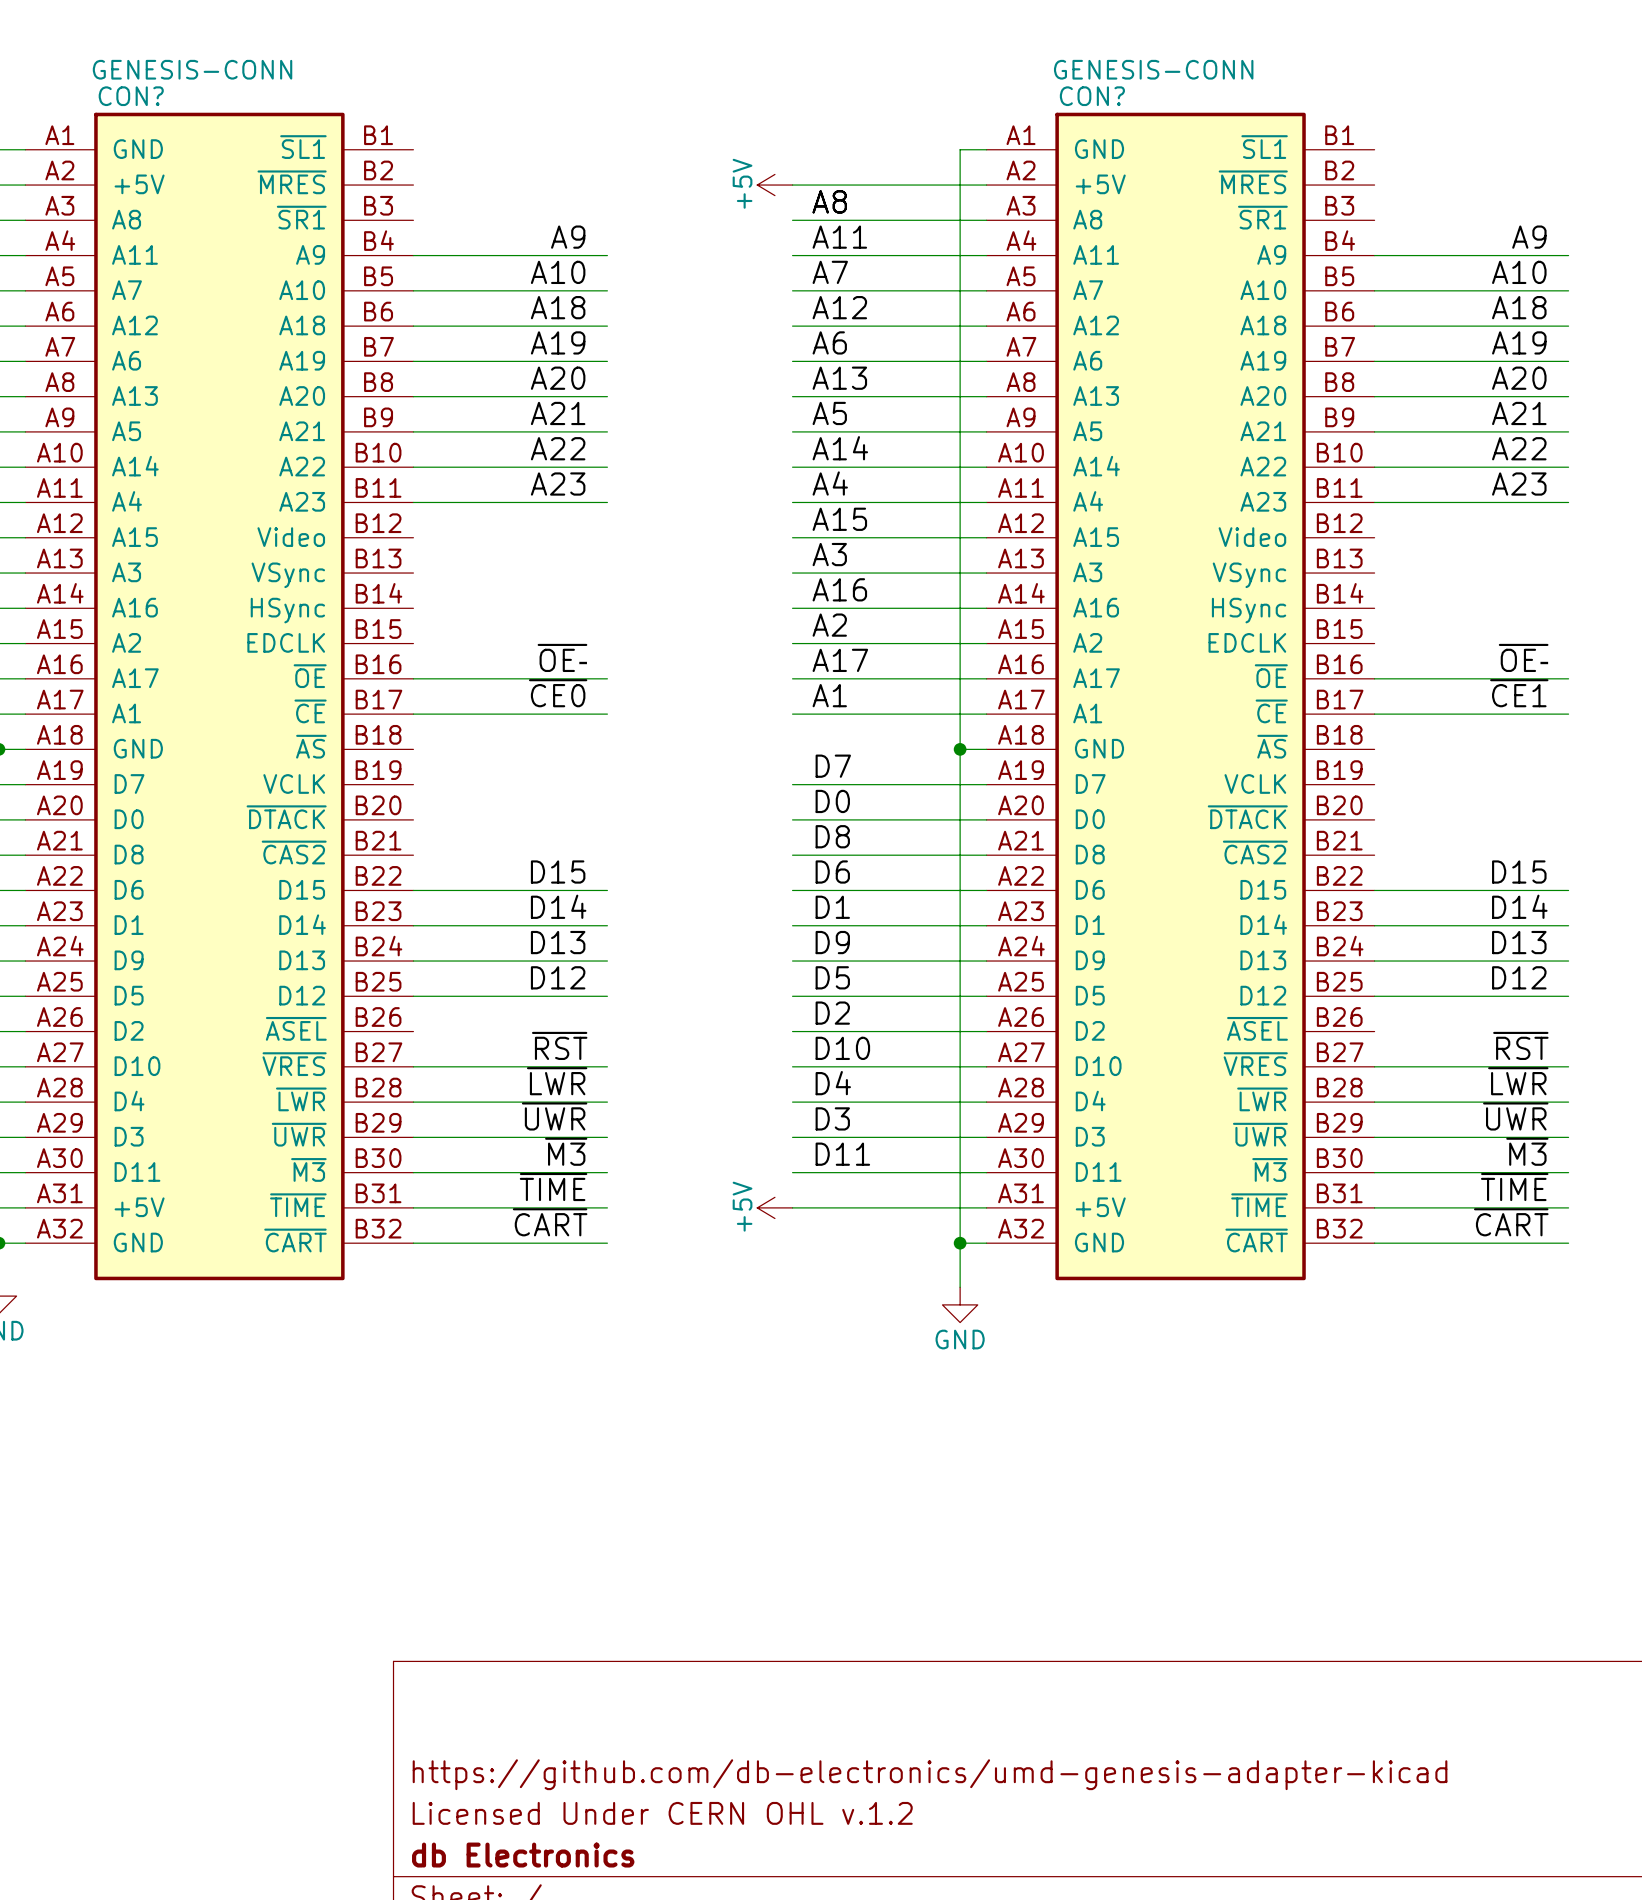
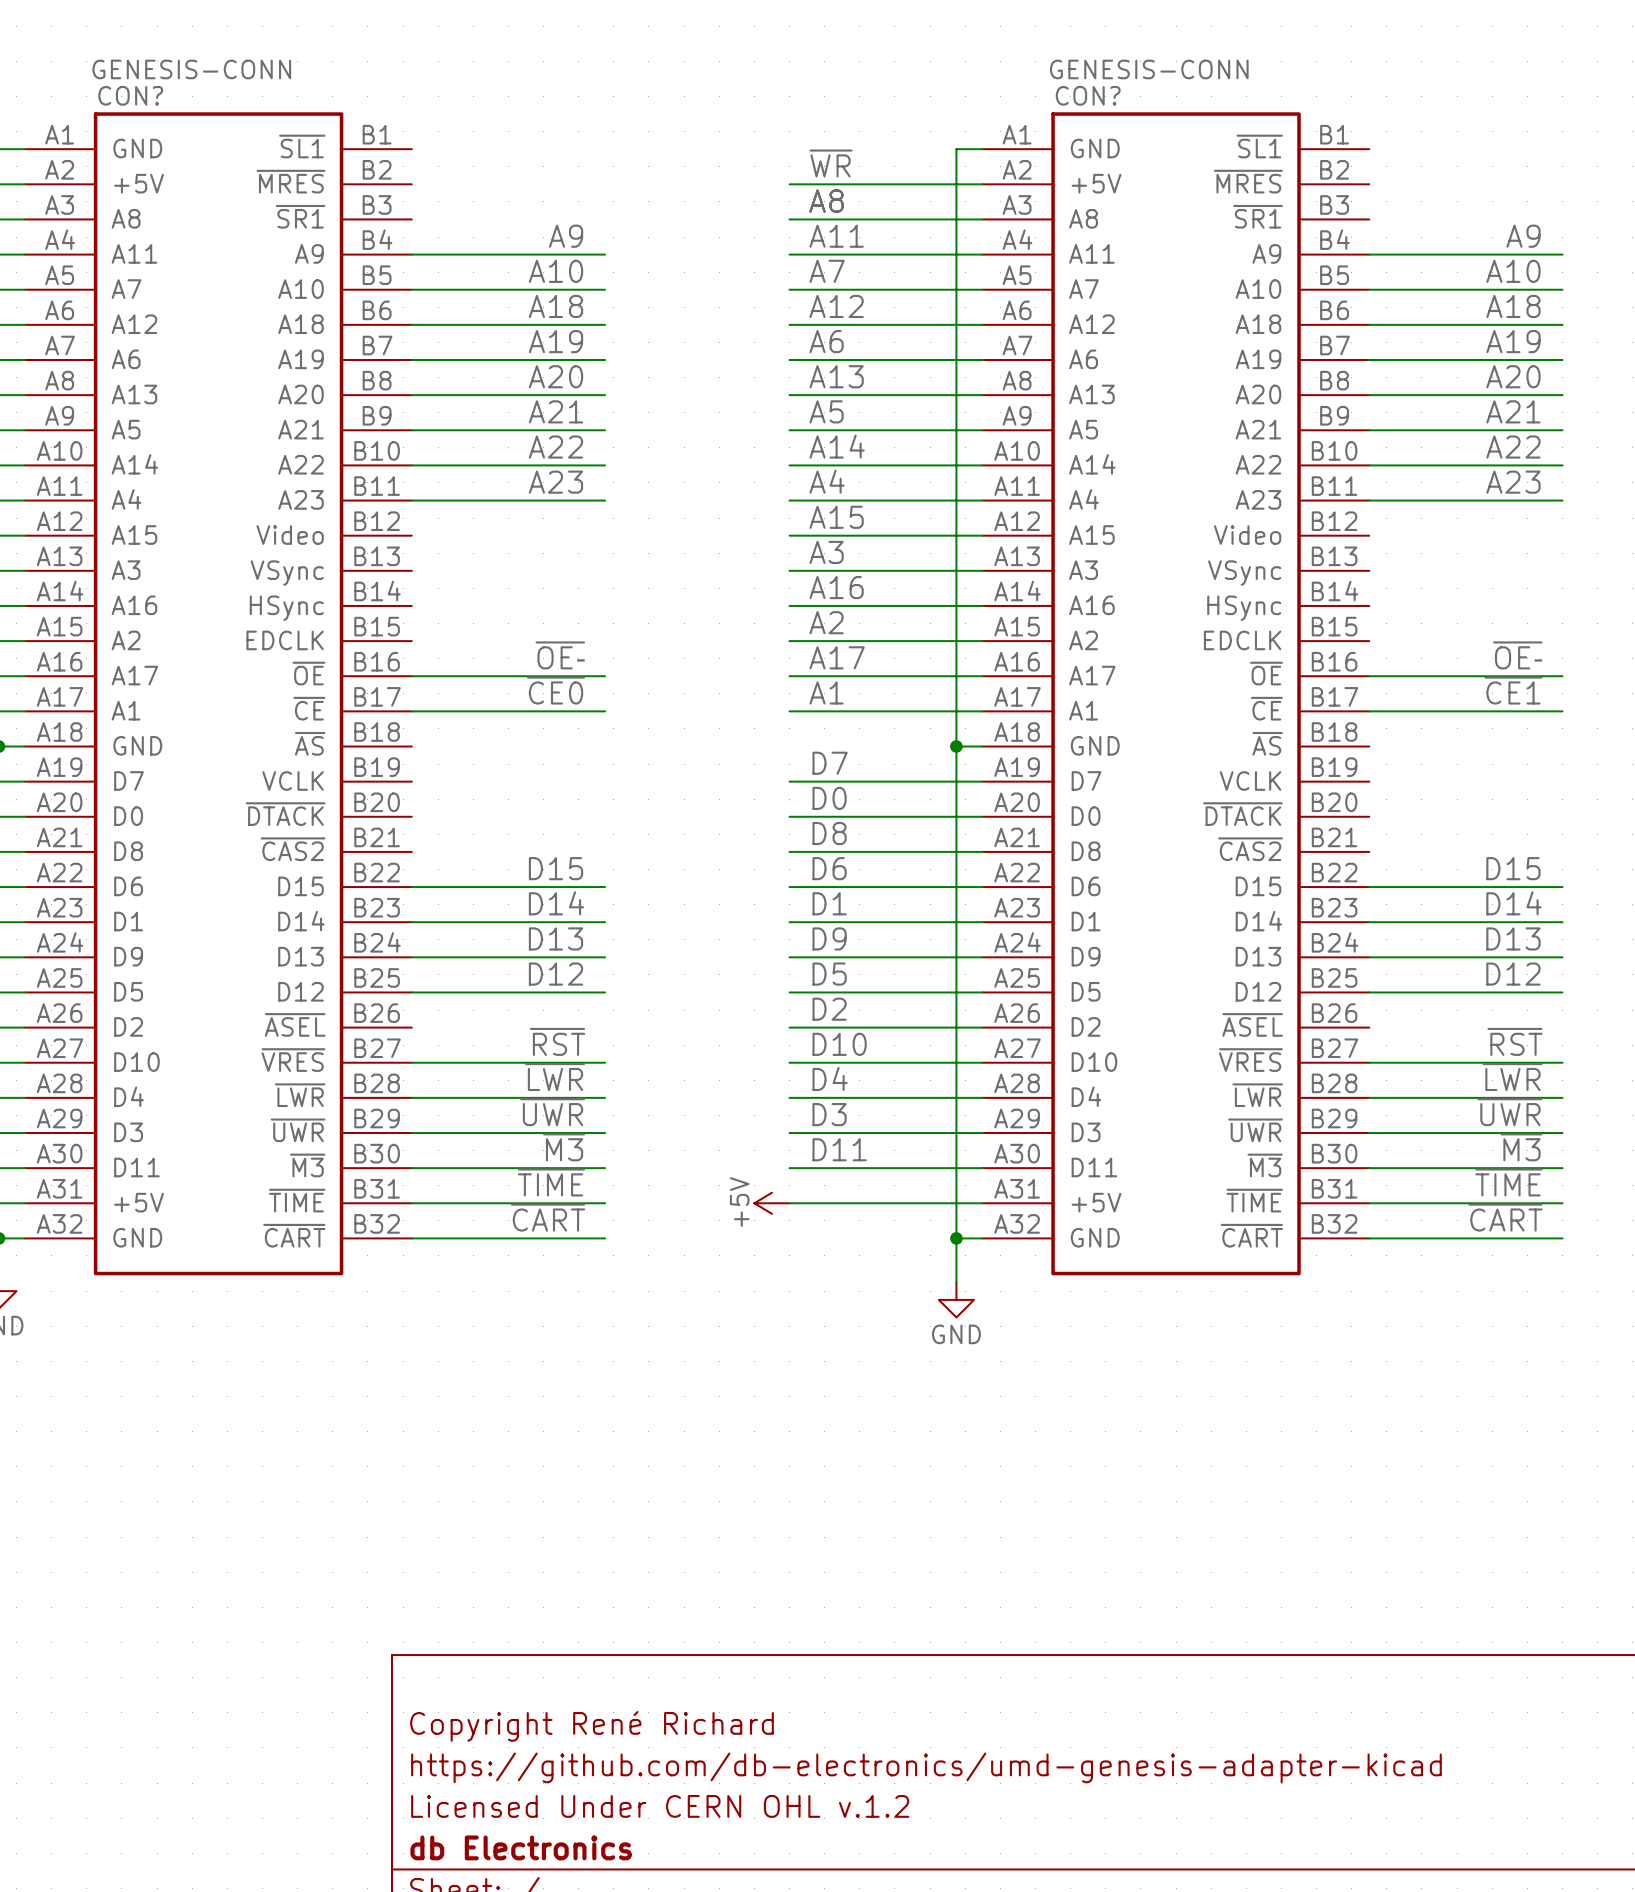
label: none -> ~{WR} (831, 163)
power symbol: +5V (774, 185) -> none
title block: none -> Copyright René Richard (591, 1726)

